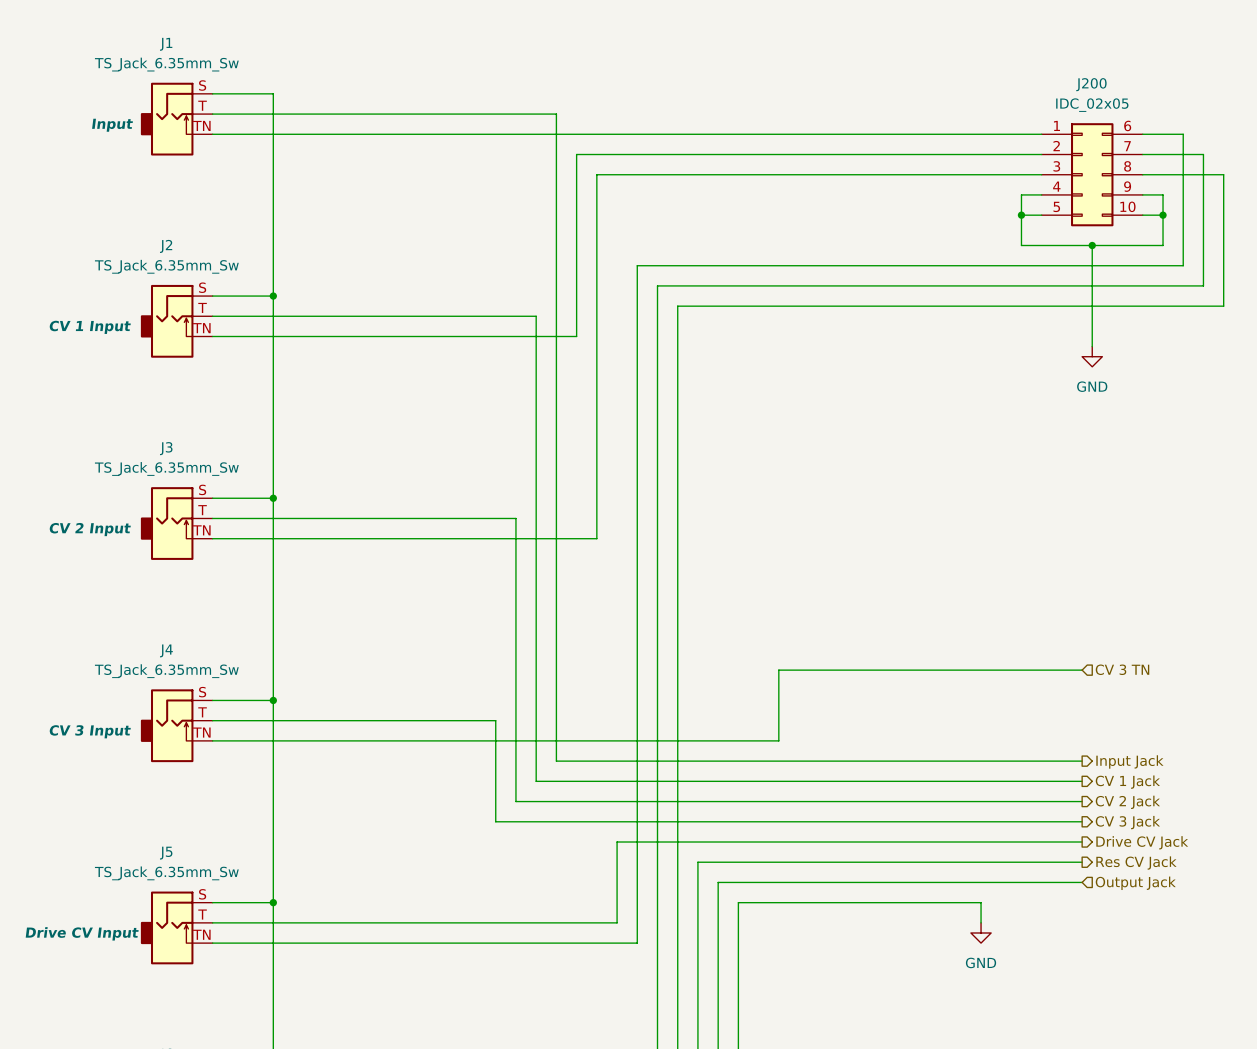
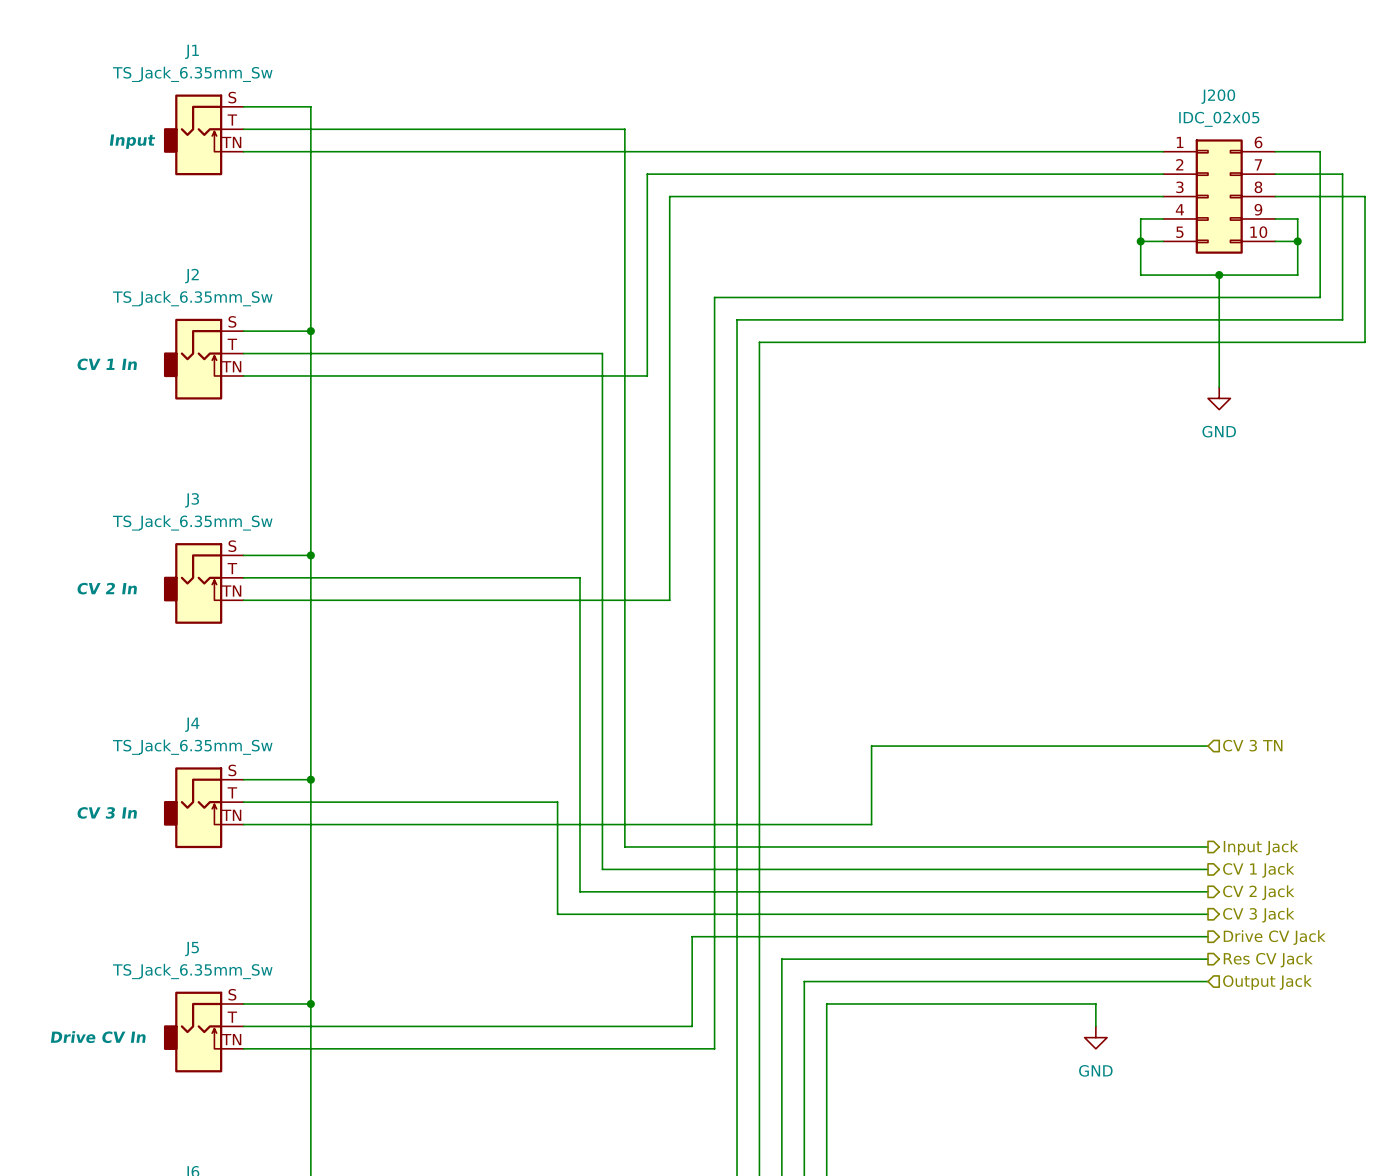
J2 text: CV 1 Input (90, 327) -> CV 1 In (107, 364)
J3 text: CV 2 Input (90, 529) -> CV 2 In (107, 588)
J4 text: CV 3 Input (90, 731) -> CV 3 In (107, 812)
J5 text: Drive CV Input (82, 933) -> Drive CV In (98, 1037)

